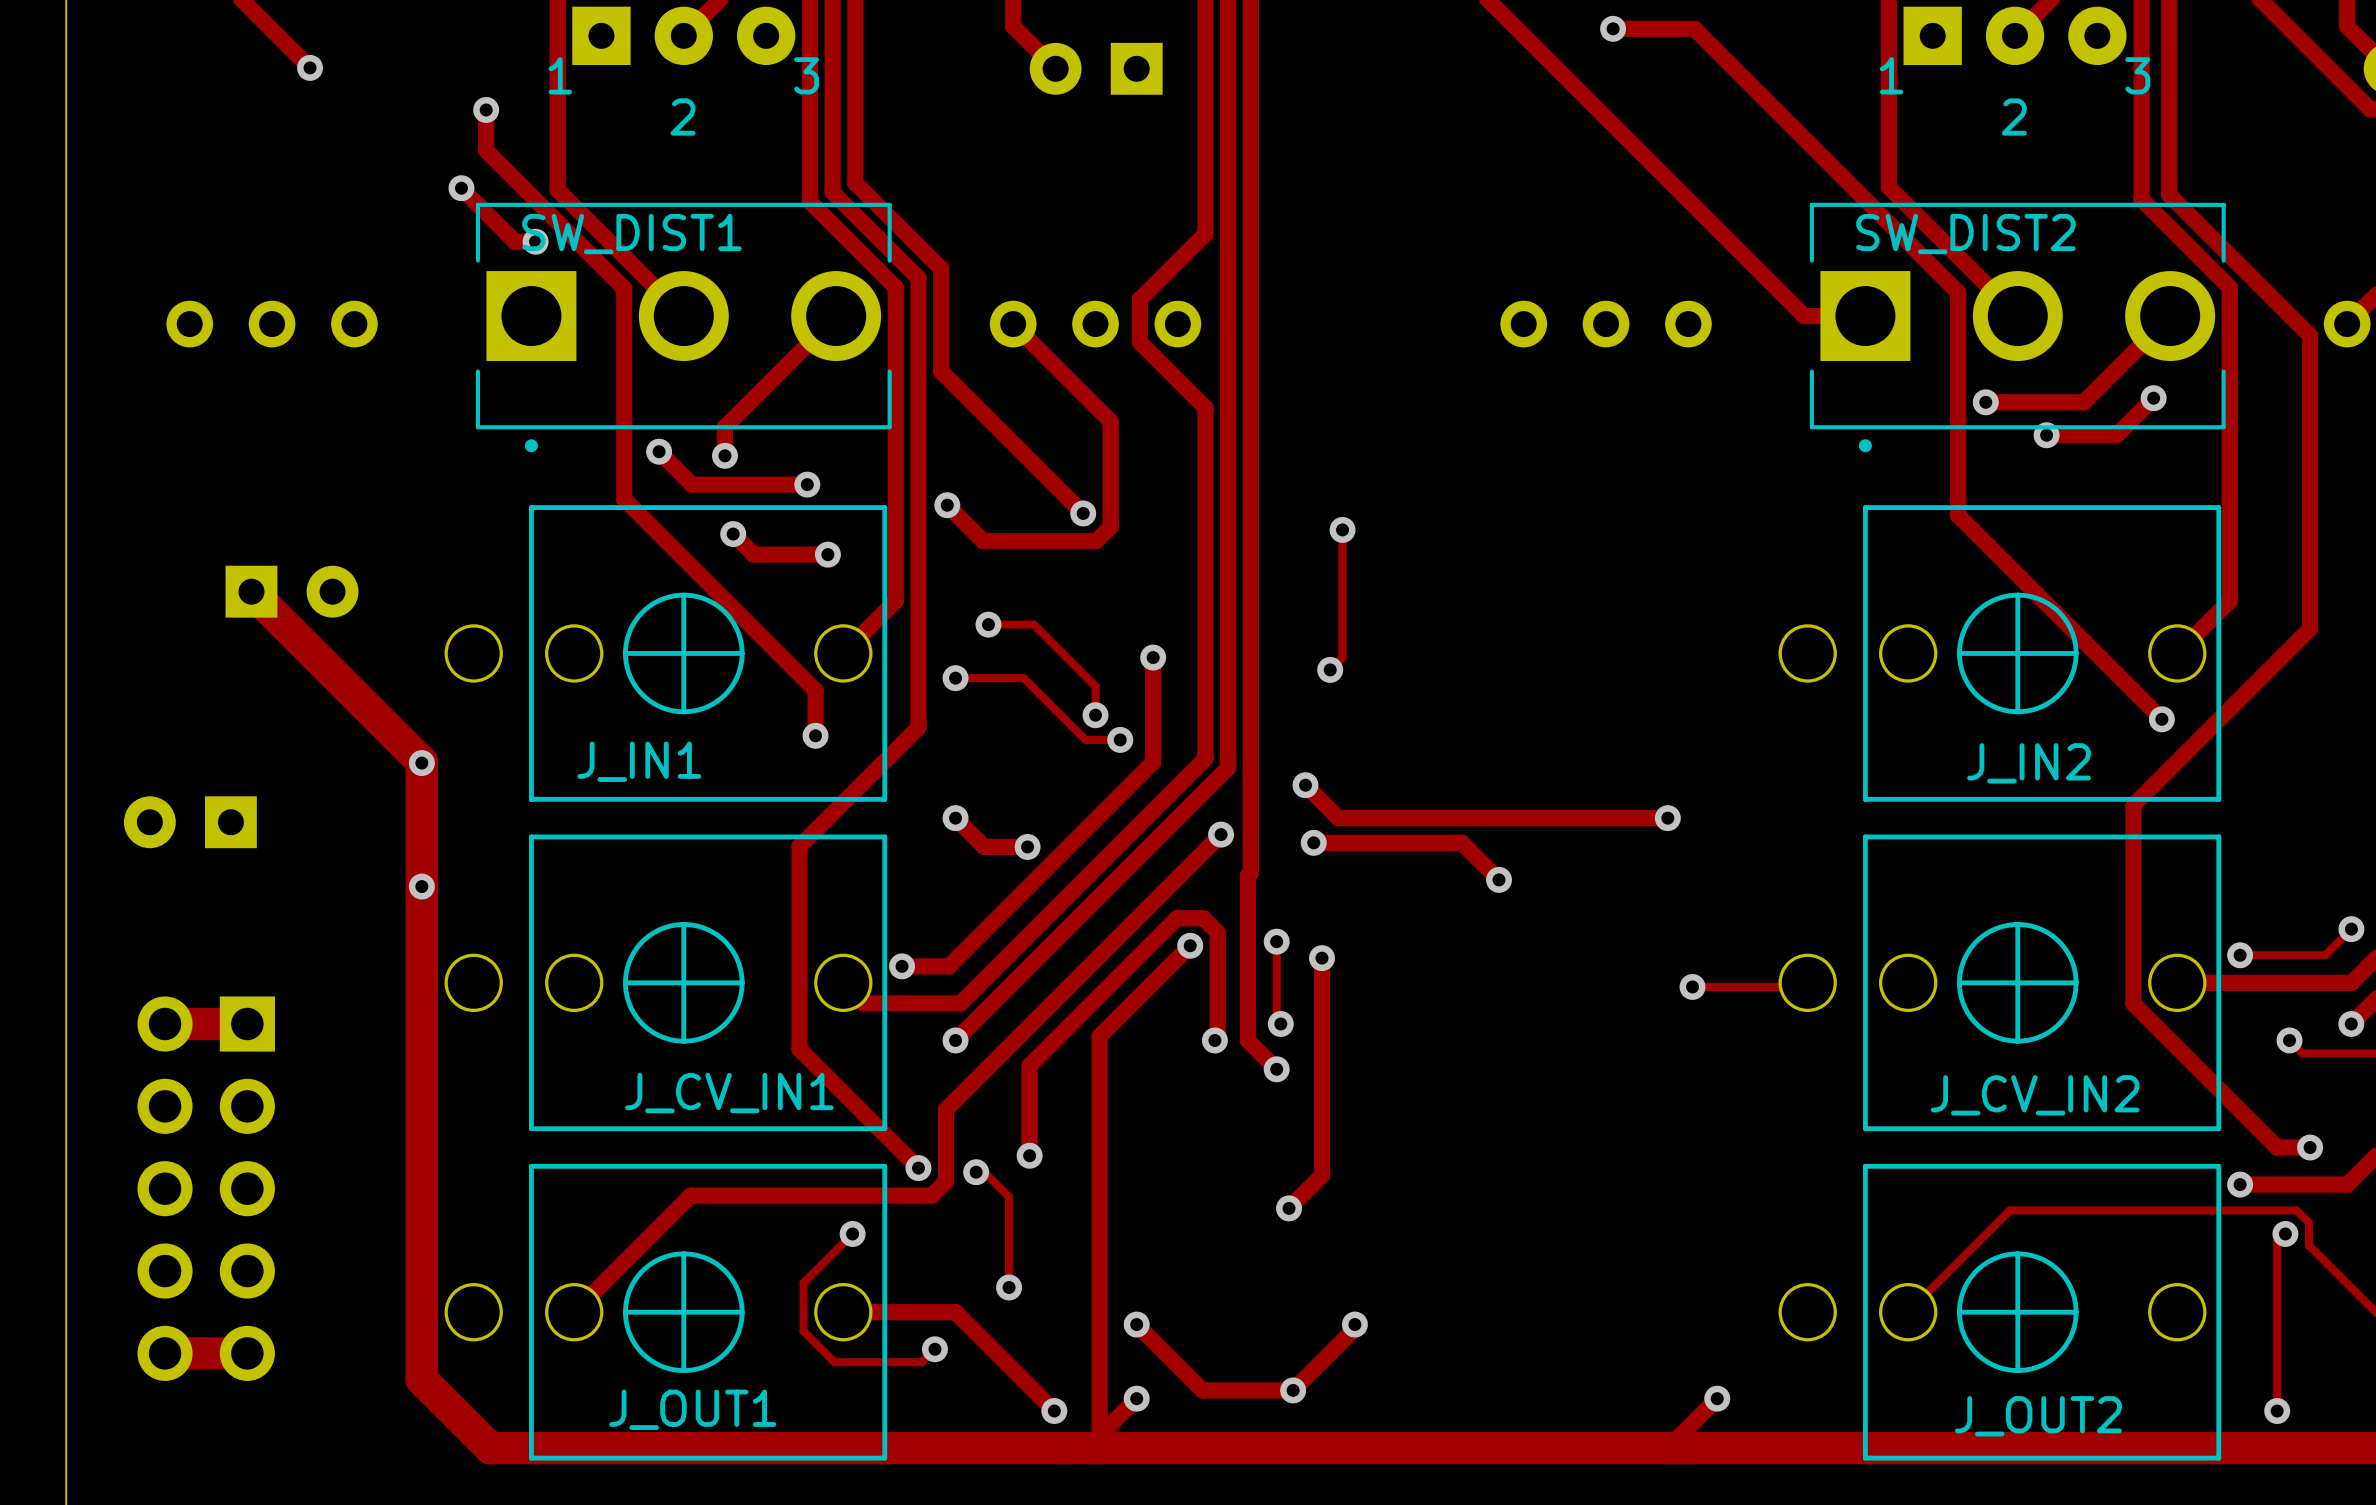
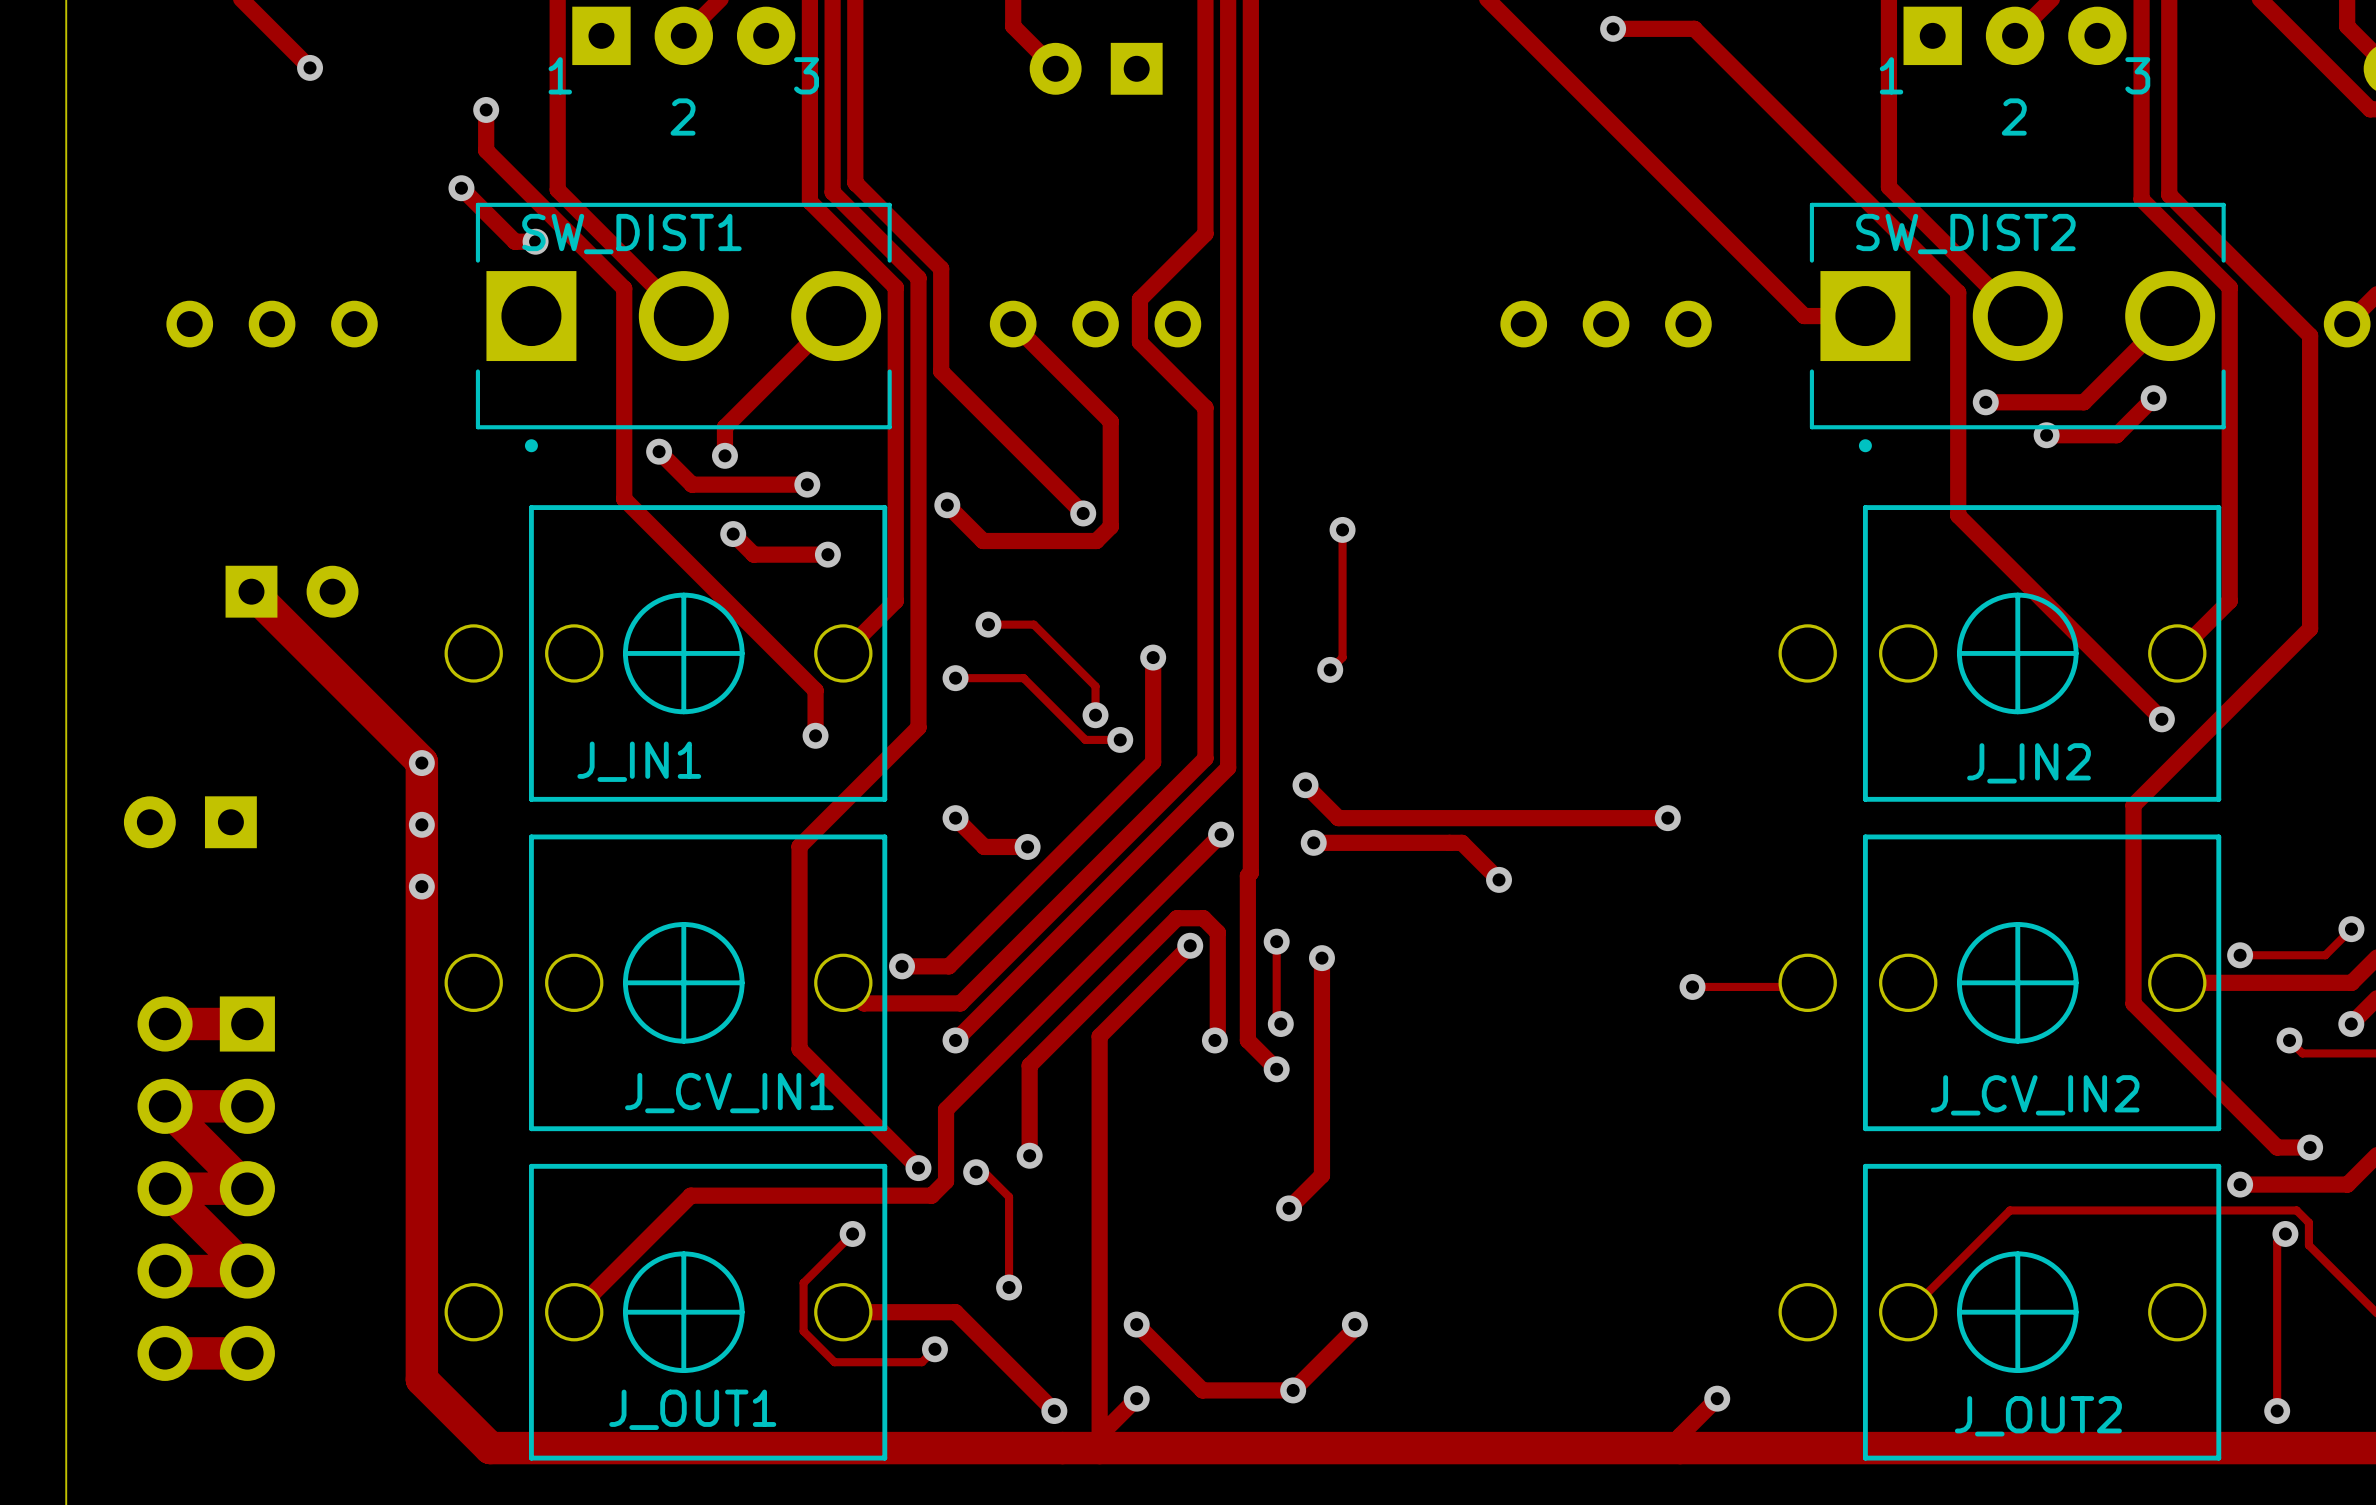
via: none -> (421, 824)
track: none -> (247, 1106) (165, 1106) (247, 1188) (165, 1188) (247, 1271) (165, 1271)

